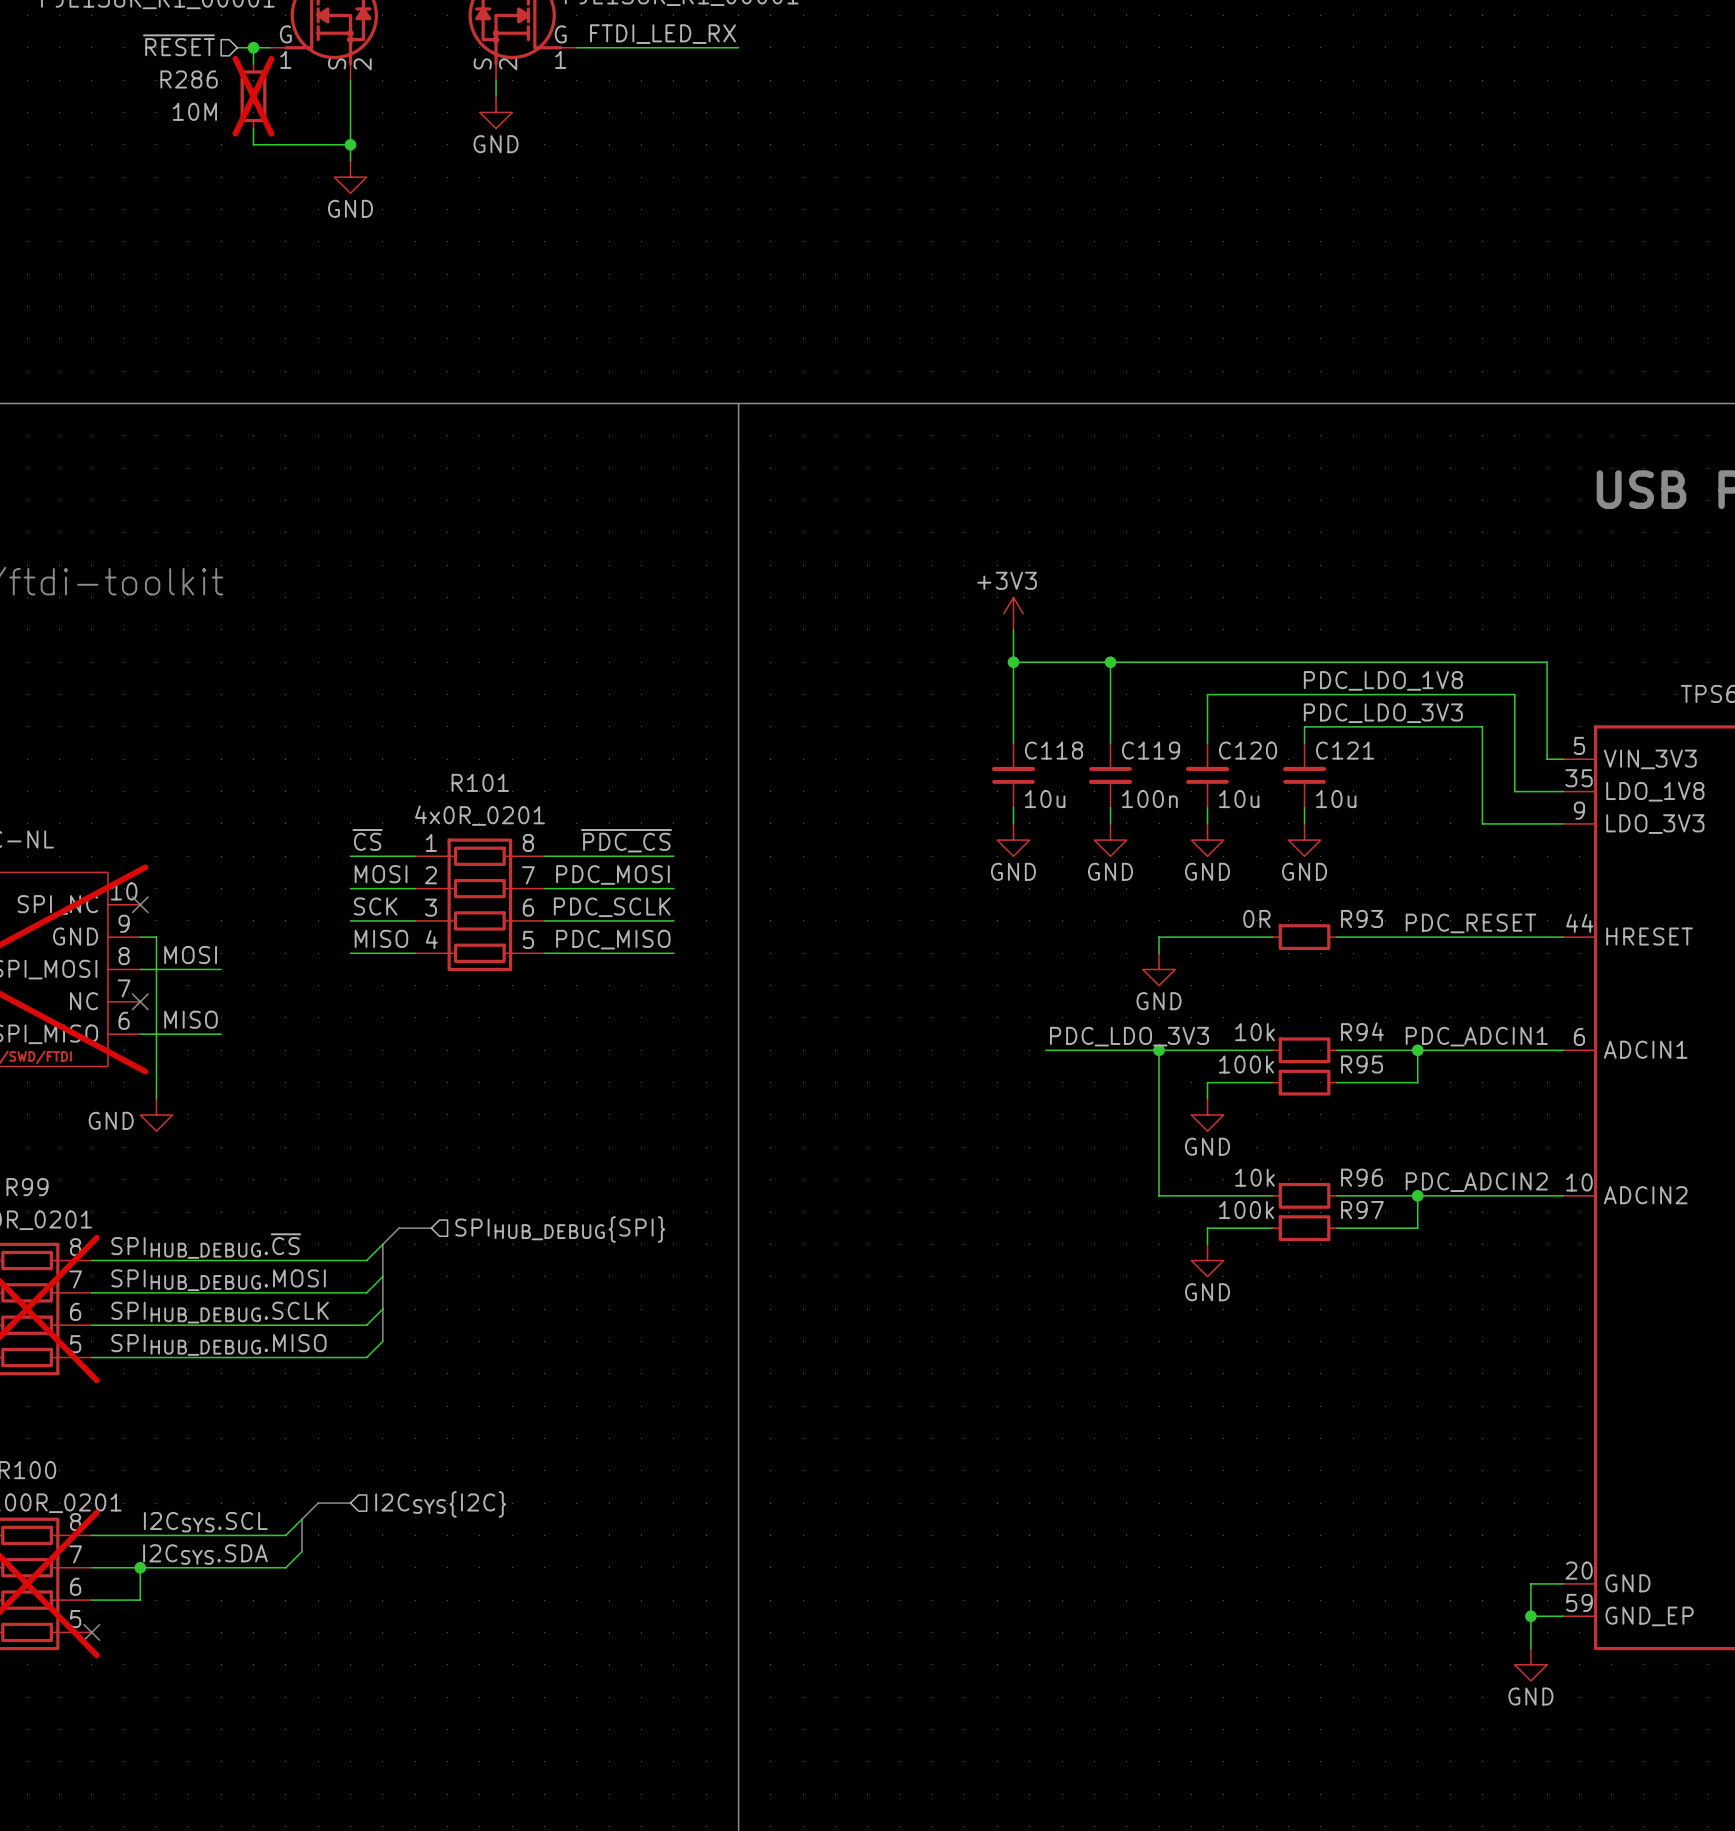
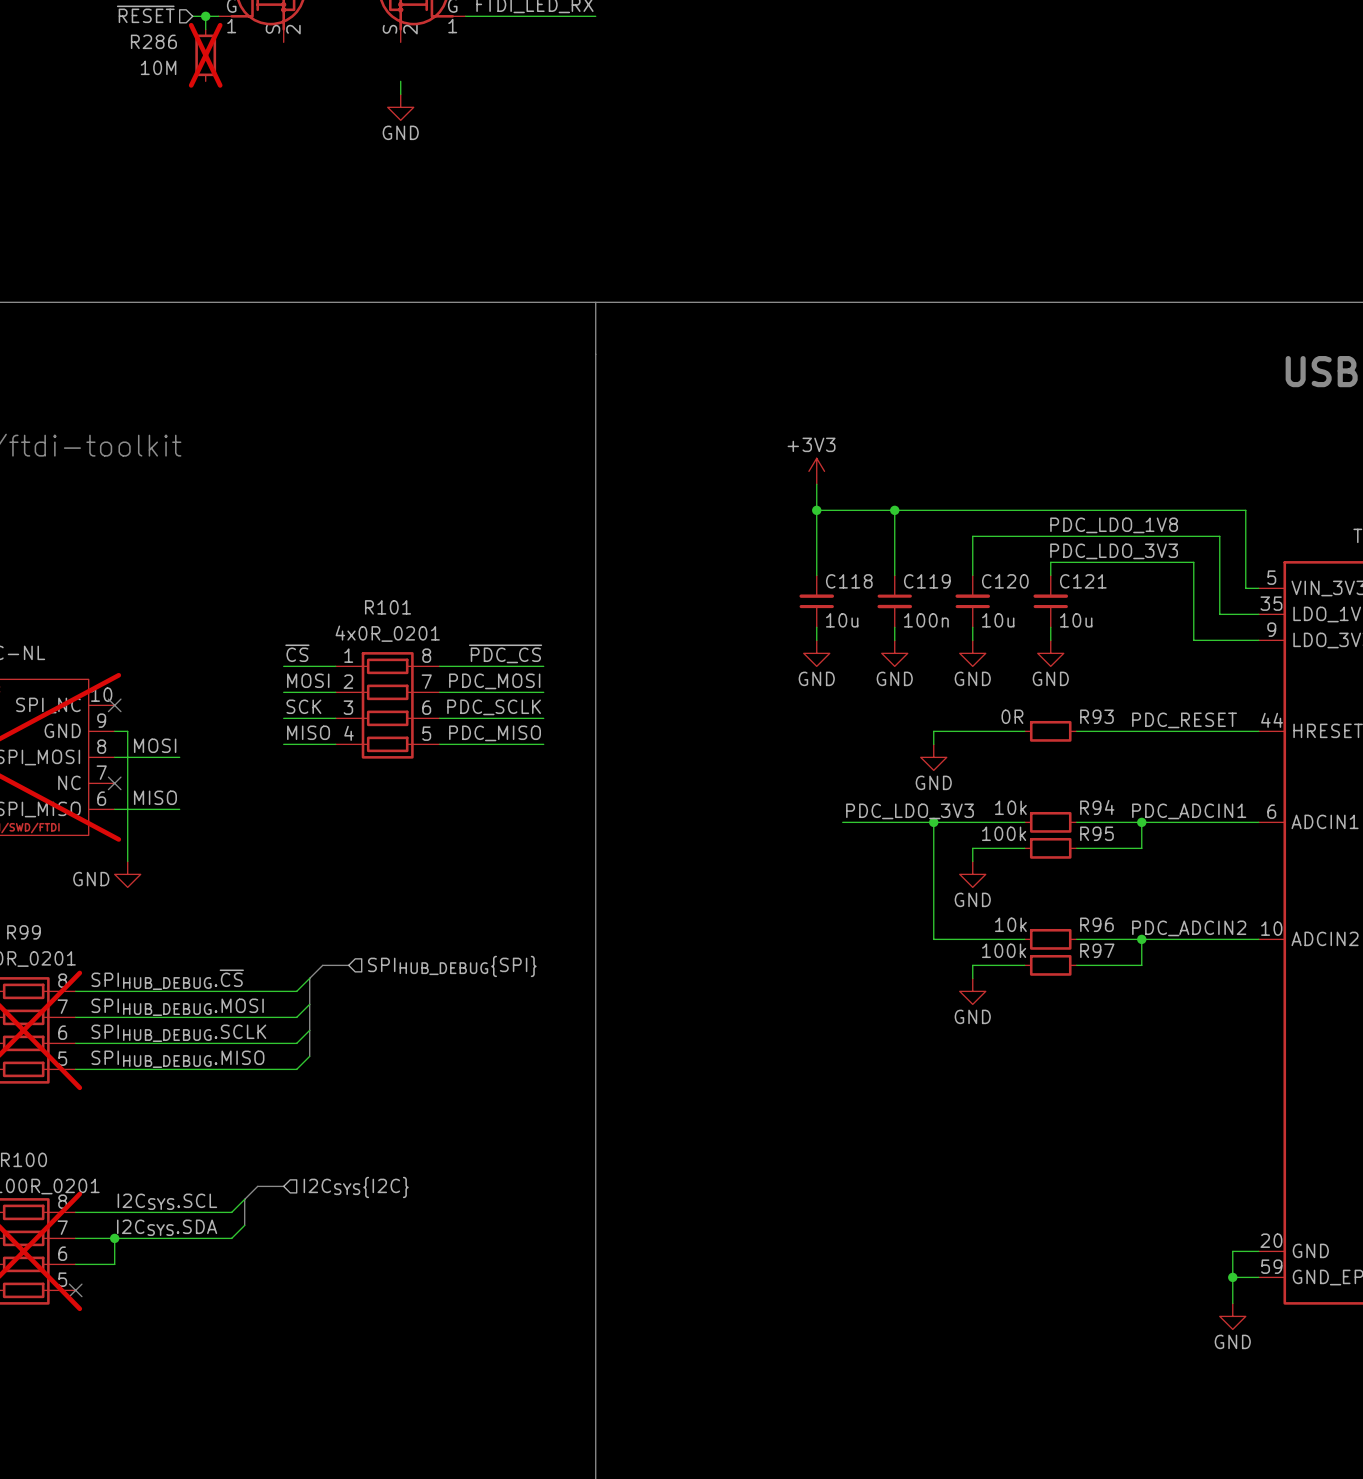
wire: (350, 80) (350, 160) -> none
wire: (496, 80) (496, 96) -> (400, 81) (400, 94)
power symbol position: GND (496, 112) -> GND (400, 107)
wire: (253, 128) (253, 144) (350, 144) -> none
junction: (350, 144) -> none
power symbol: GND (350, 177) -> none

